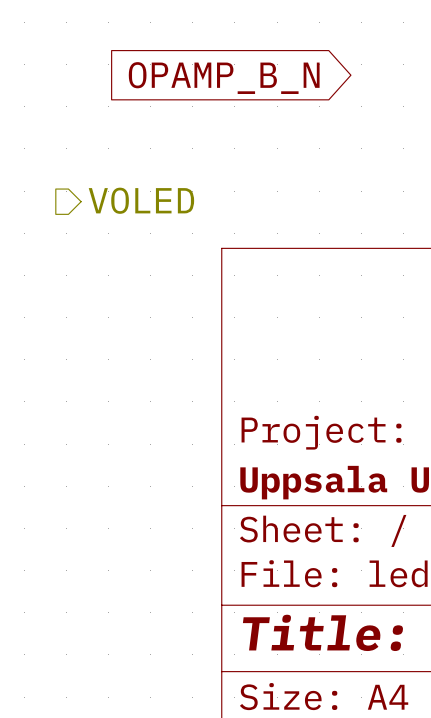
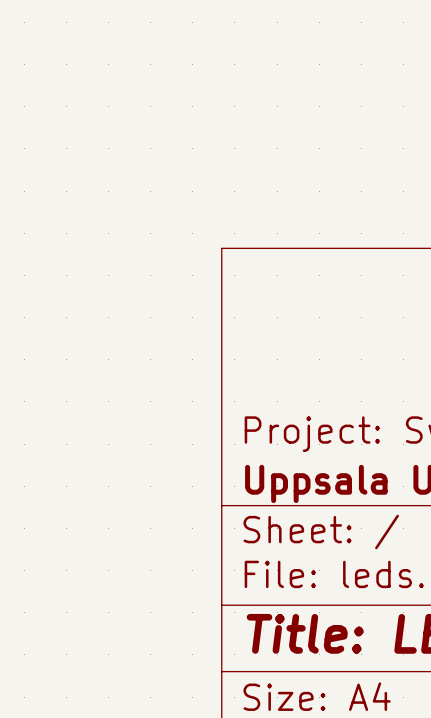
global label: OPAMP_B_N (224, 78) -> none
hierarchical label: VOLED (141, 200) -> none

